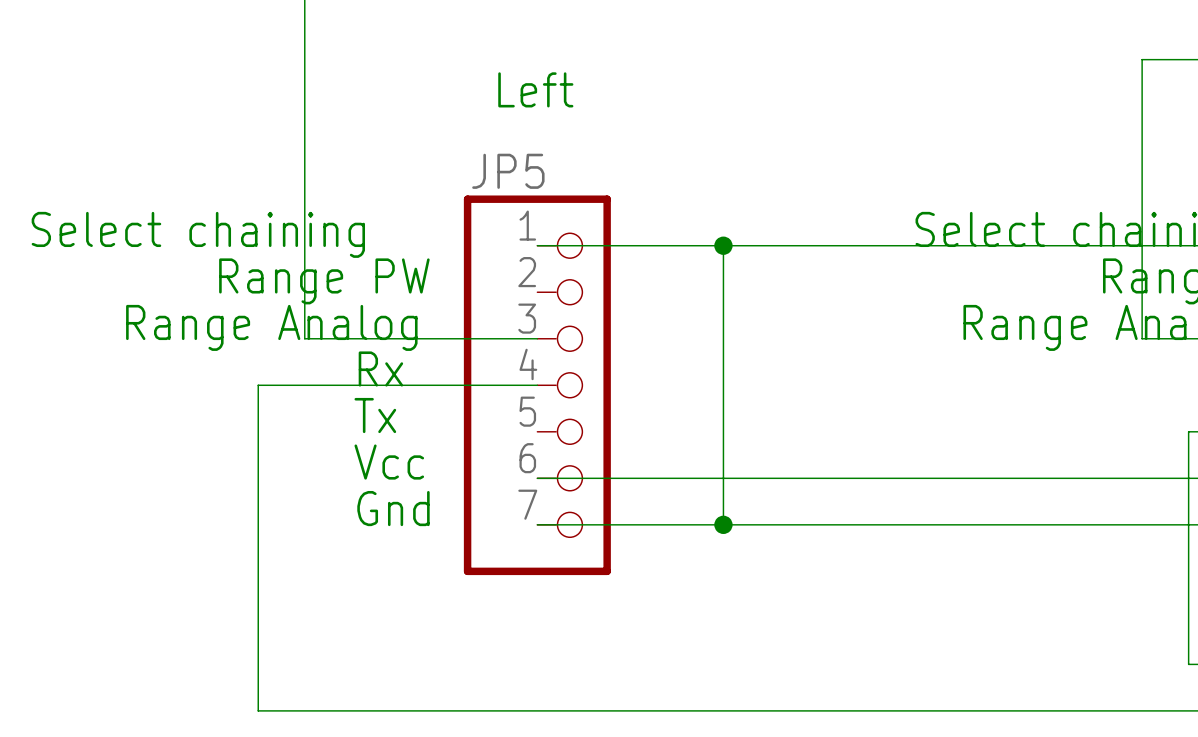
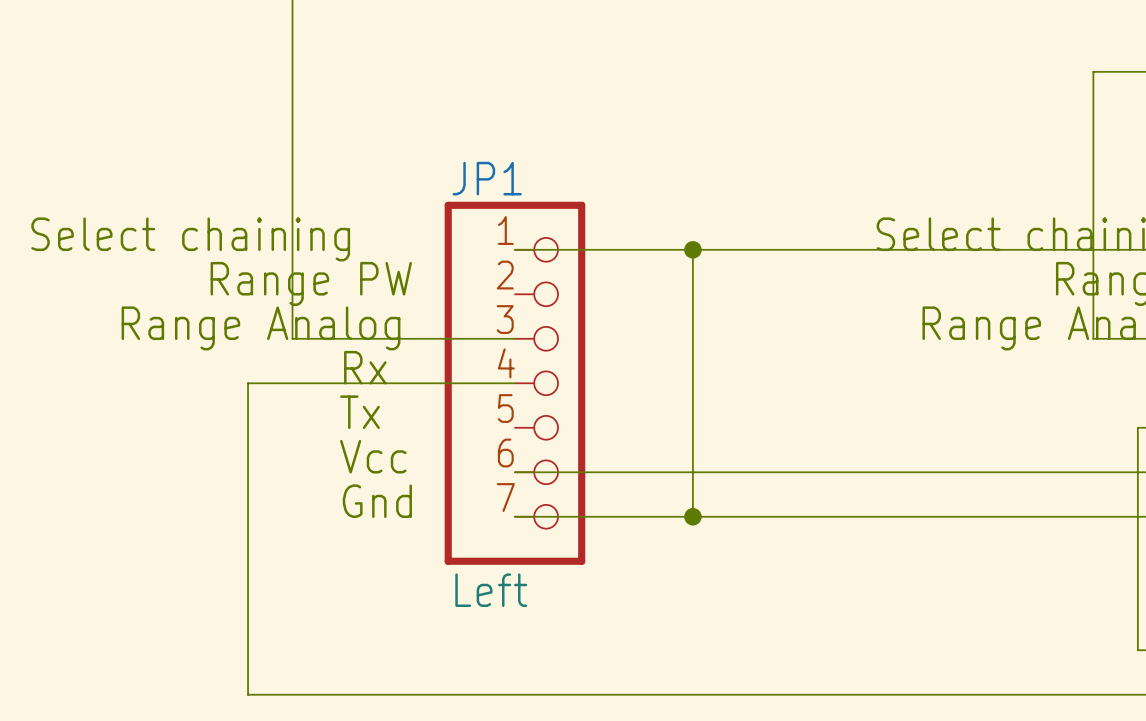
text: Left (535, 89) -> none
JP5 name: JP5 (508, 171) -> JP1 (487, 178)
JP5 value: none -> Left (491, 590)

